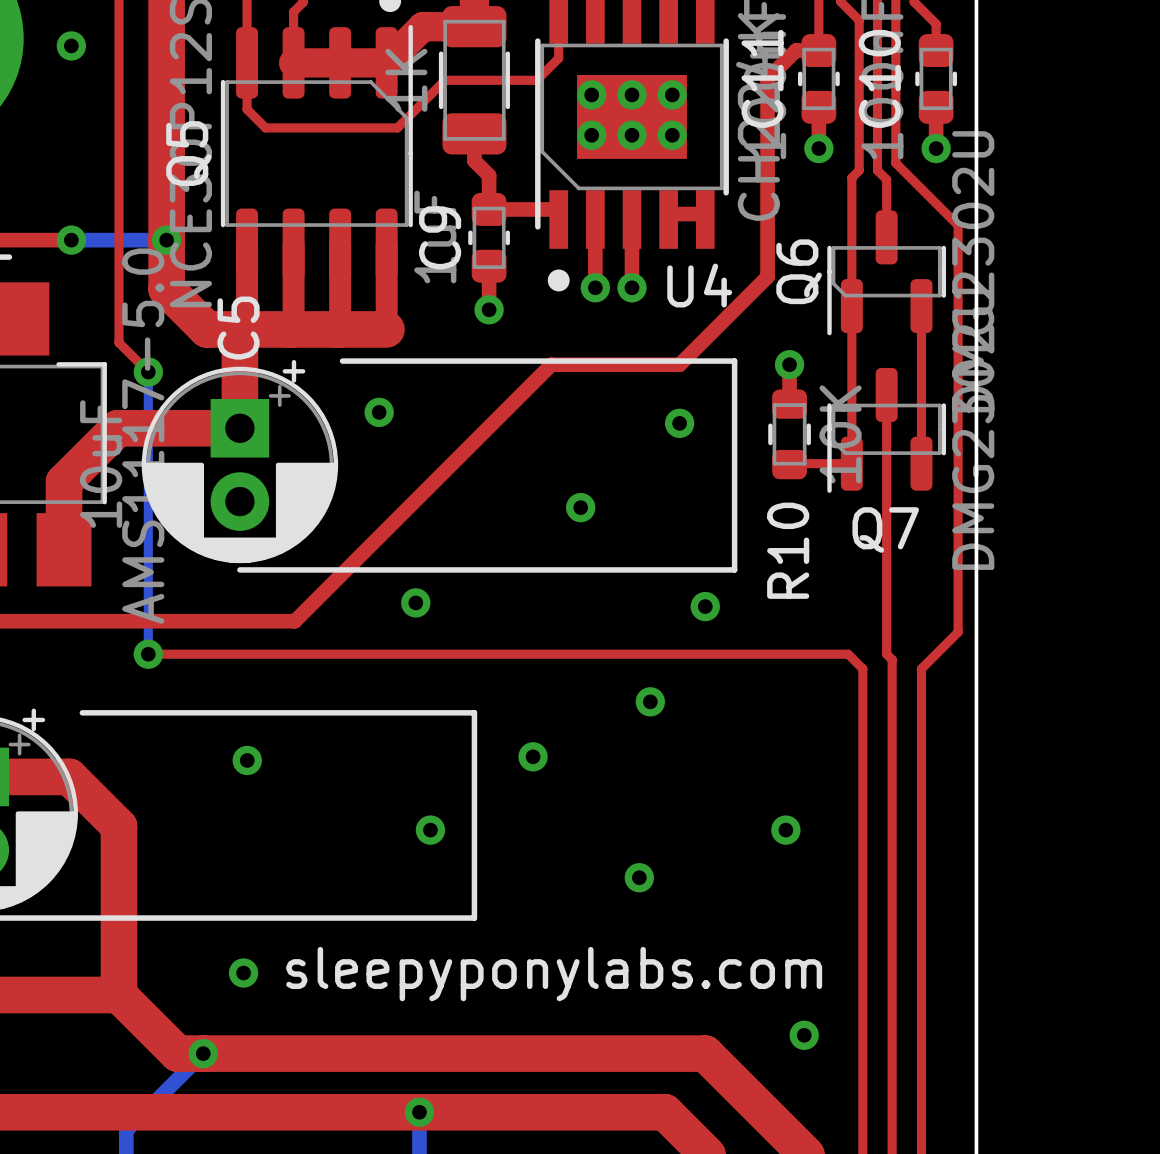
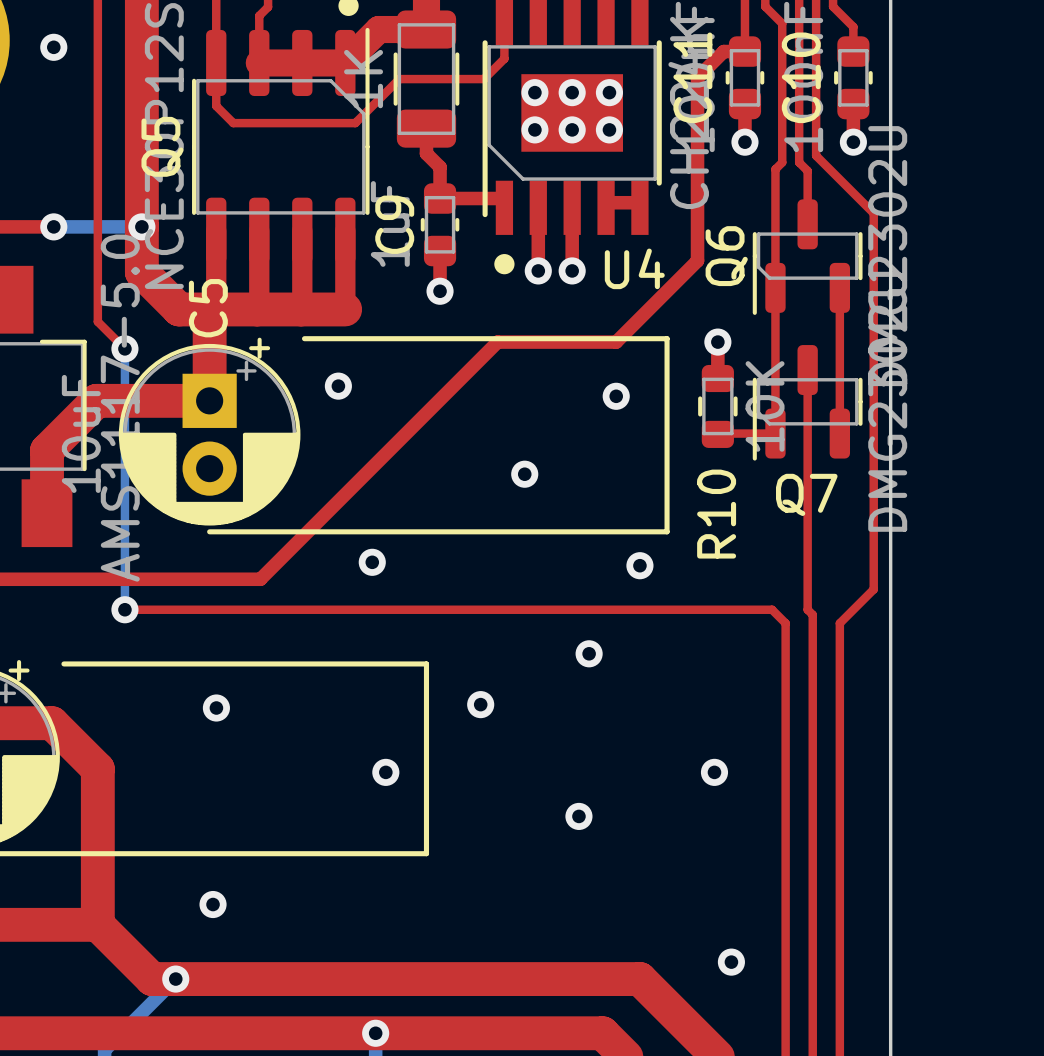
text: sleepyponylabs.com (554, 974) -> none

